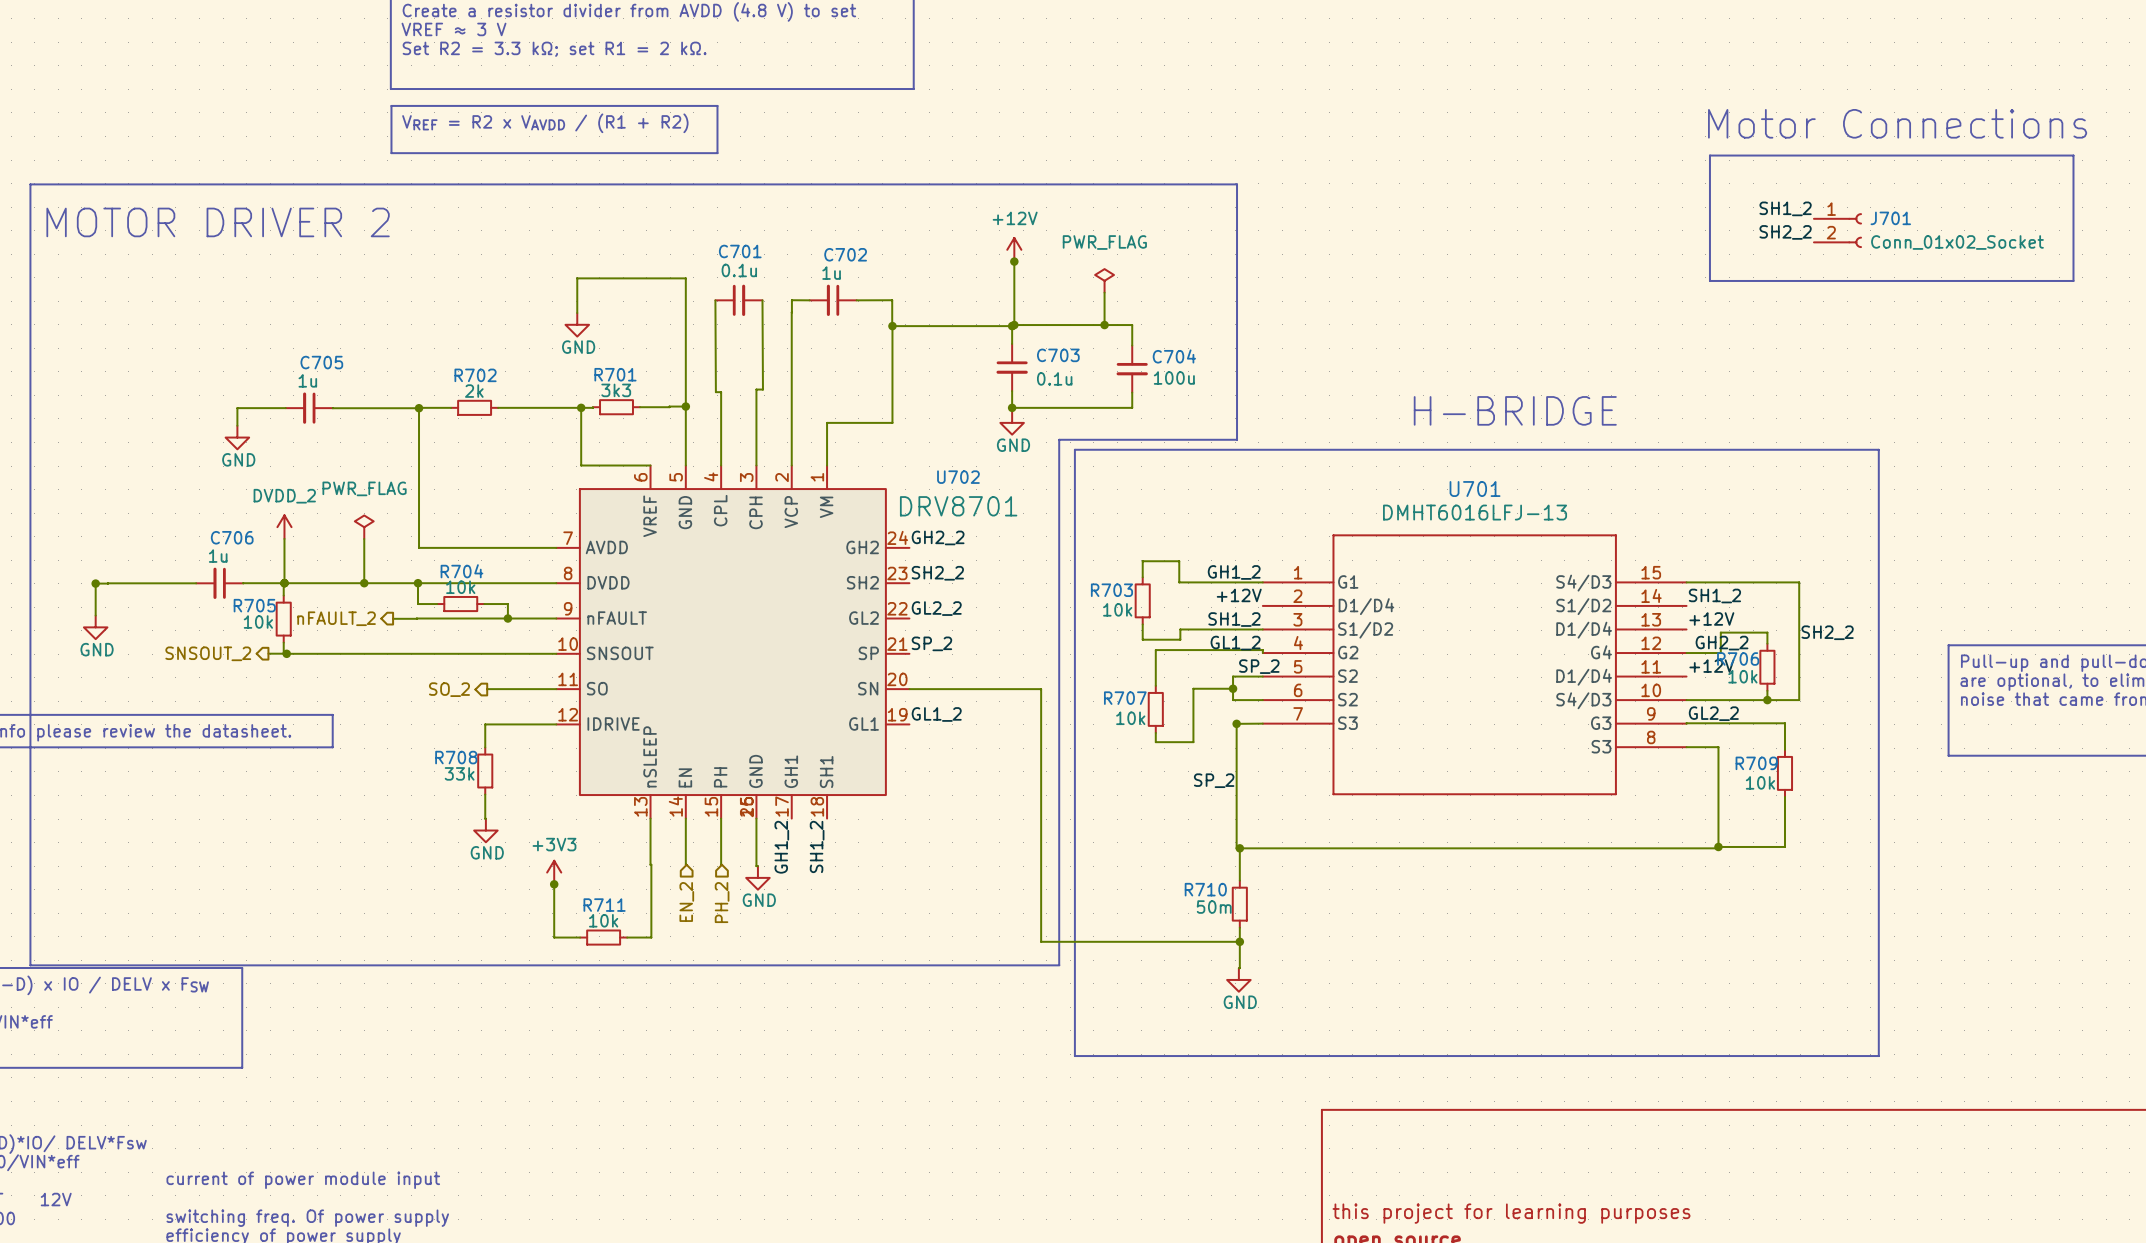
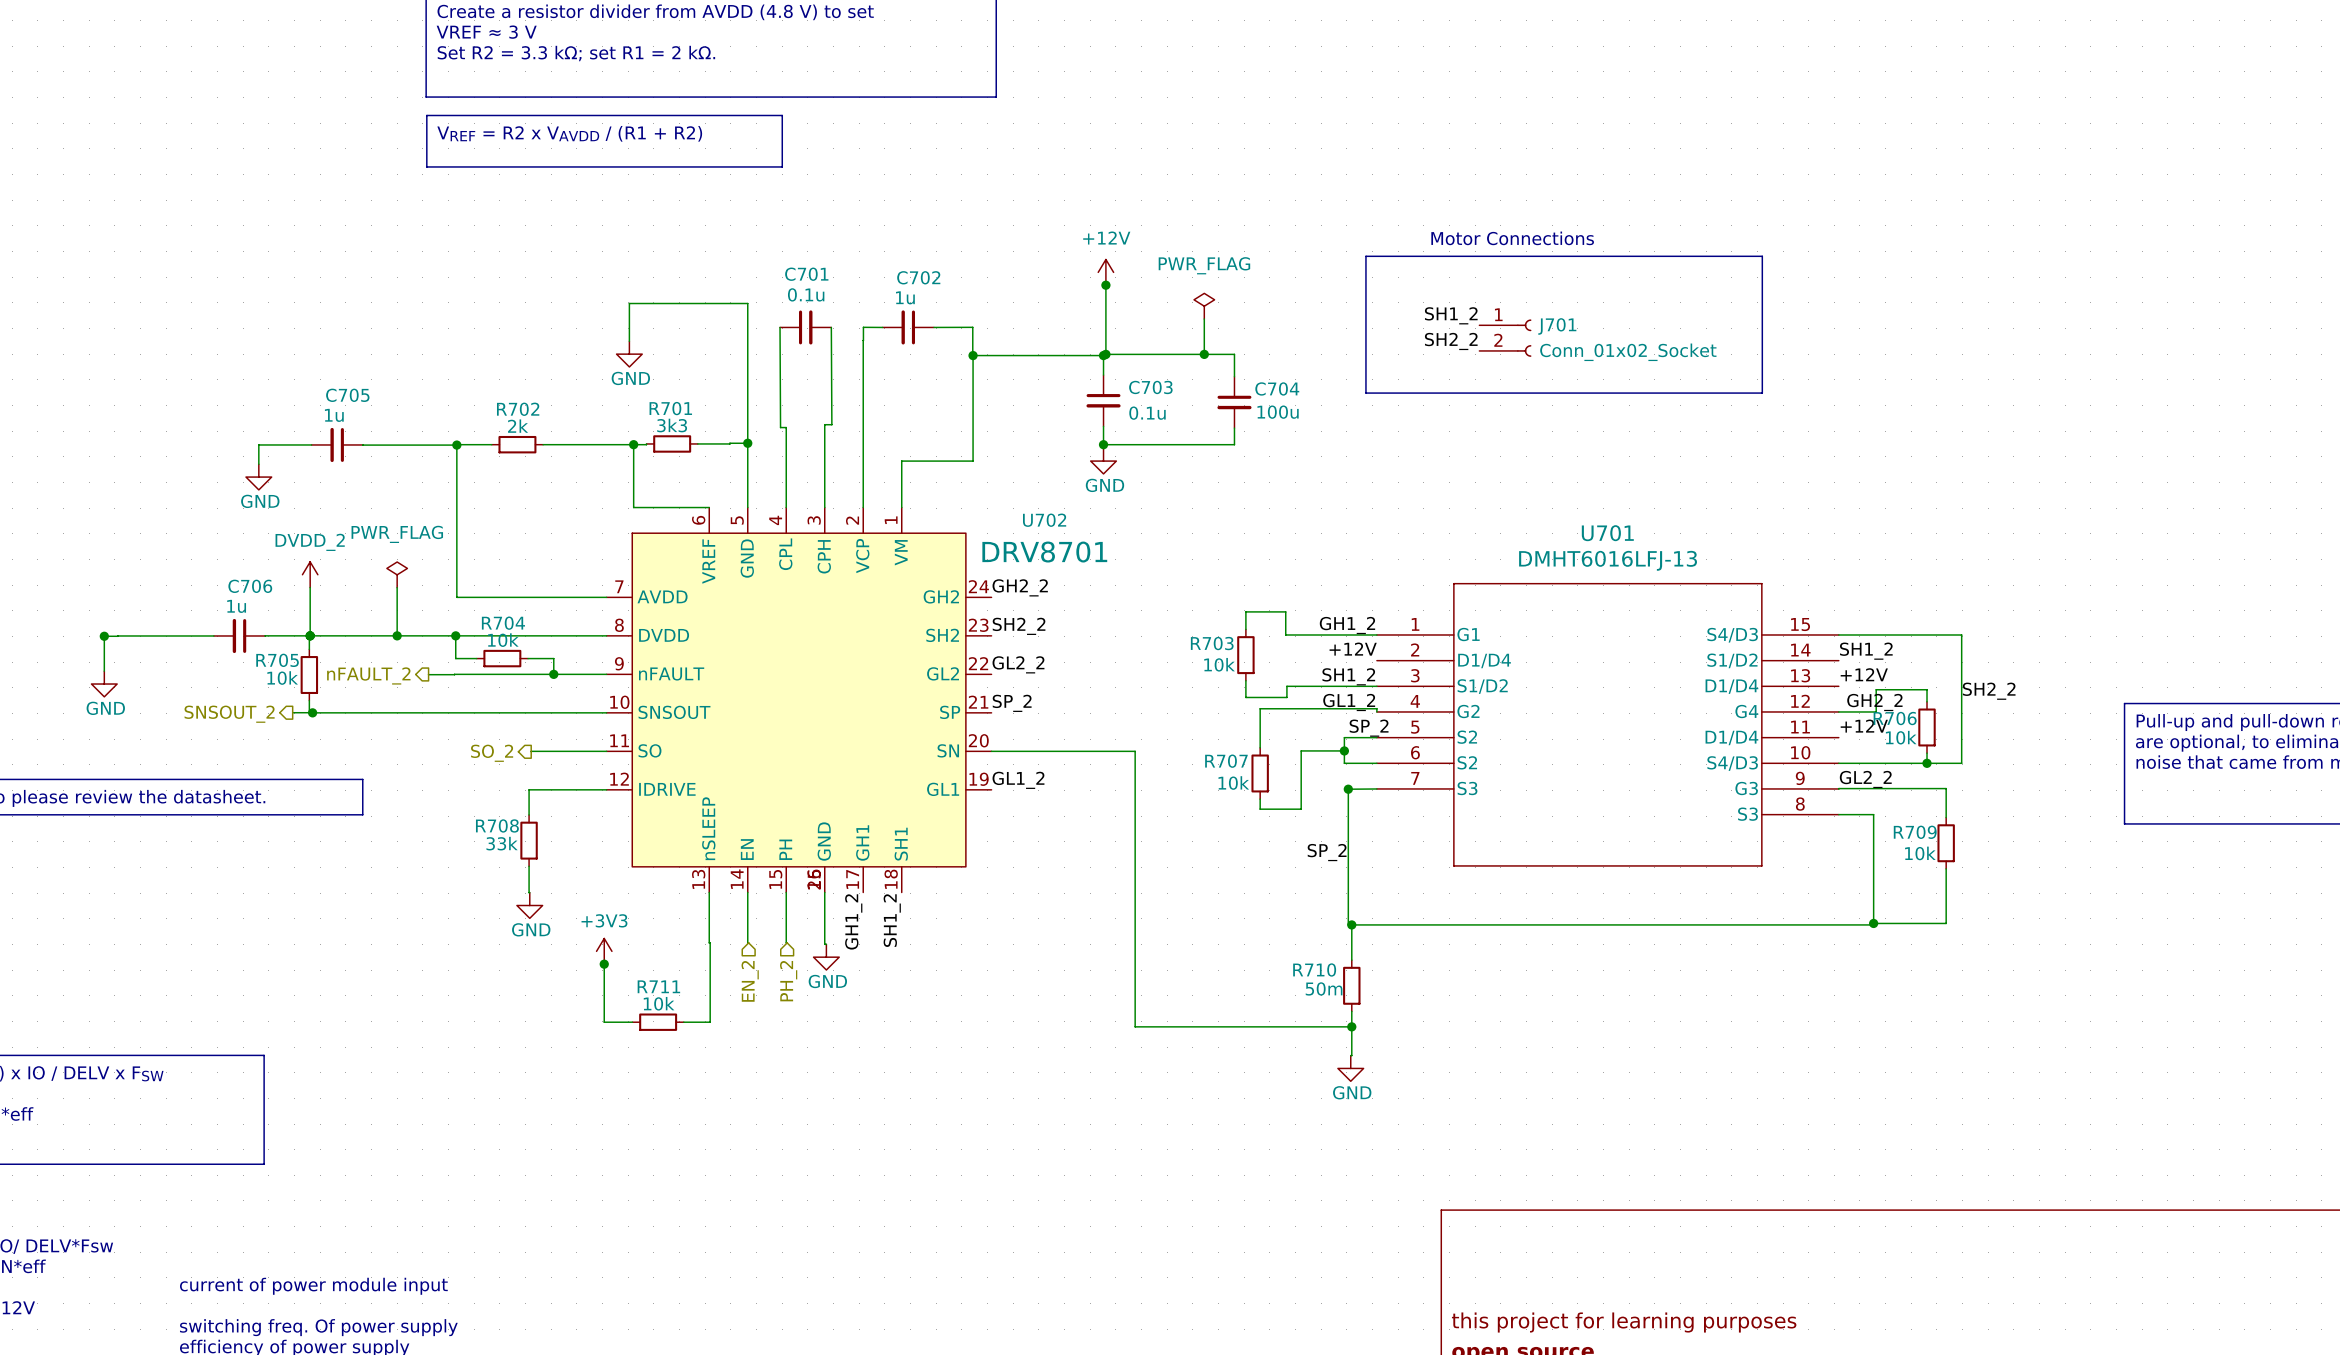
text: Motor Connections (1897, 123) -> none
line: (1709, 155) (2073, 155) (2073, 280) (1709, 280) (1709, 155) -> none
label: SH1_2 (1785, 208) -> none
text: none -> Motor Connections (1512, 238)
text: MOTOR DRIVER 2 (218, 222) -> none
J701 position: (1837, 230) -> (1505, 338)
label: SH2_2 (1785, 232) -> none
line: none -> (1365, 256) (1762, 256) (1762, 393) (1365, 393) (1365, 256)
label: none -> SH1_2 (1451, 315)
label: none -> SH2_2 (1451, 341)
text: H-BRIDGE (1515, 410) -> none
line: (1074, 449) (1878, 449) (1878, 1056) (1074, 1056) (1074, 449) -> none
line: (1059, 965) (1059, 439) (1237, 439) (1237, 184) (30, 184) (30, 965) (1059, 965) -> none

